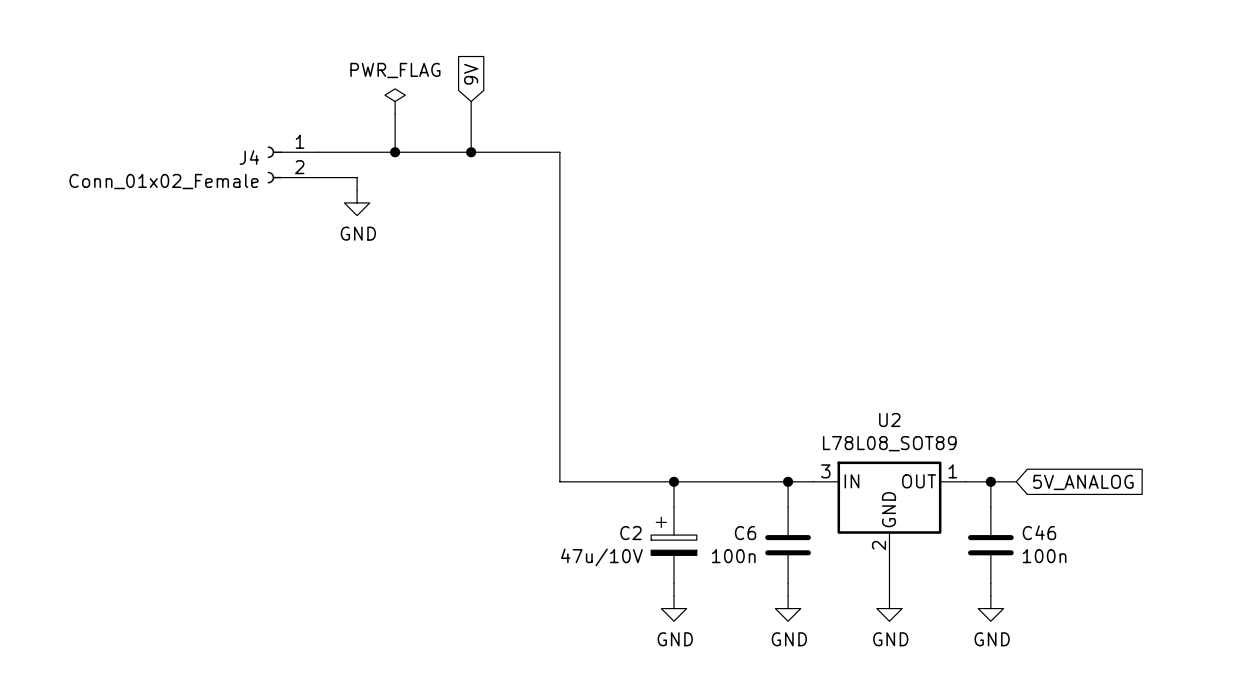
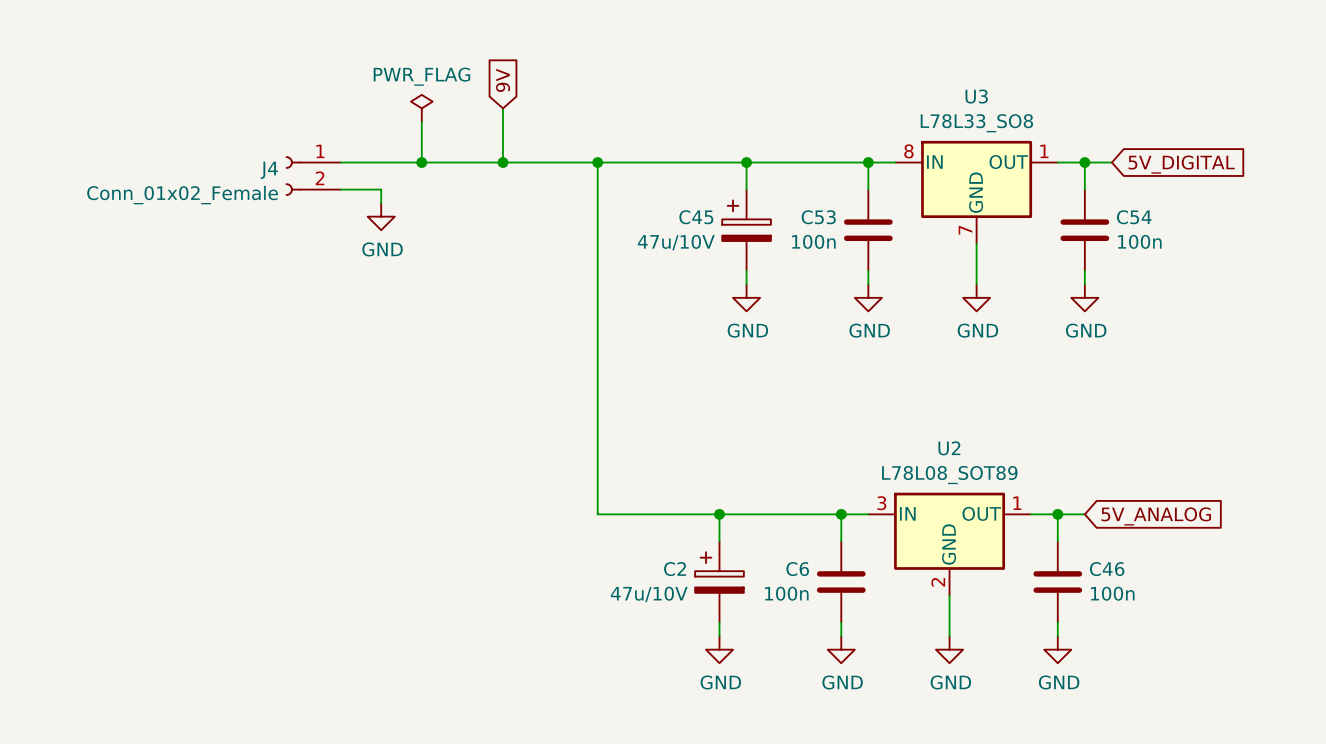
wire: none -> (597, 162) (895, 162)
junction: none -> (597, 162)
wire: none -> (746, 162) (746, 189)
junction: none -> (746, 162)
wire: none -> (868, 162) (868, 189)
junction: none -> (868, 162)
wire: none -> (1057, 162) (1111, 162)
wire: none -> (1084, 162) (1084, 189)
junction: none -> (1084, 162)
global label: none -> 5V_DIGITAL (1181, 164)
U3: none -> L78L33_SO8 (976, 192)
C45: none -> 47u/10V (746, 230)
C53: none -> 100n (868, 230)
C54: none -> 100n (1084, 230)
wire: none -> (976, 243) (976, 284)
wire: none -> (746, 270) (746, 284)
wire: none -> (868, 270) (868, 284)
wire: none -> (1084, 270) (1084, 284)
power symbol: none -> GND (746, 297)
power symbol: none -> GND (868, 297)
power symbol: none -> GND (976, 297)
power symbol: none -> GND (1084, 297)

